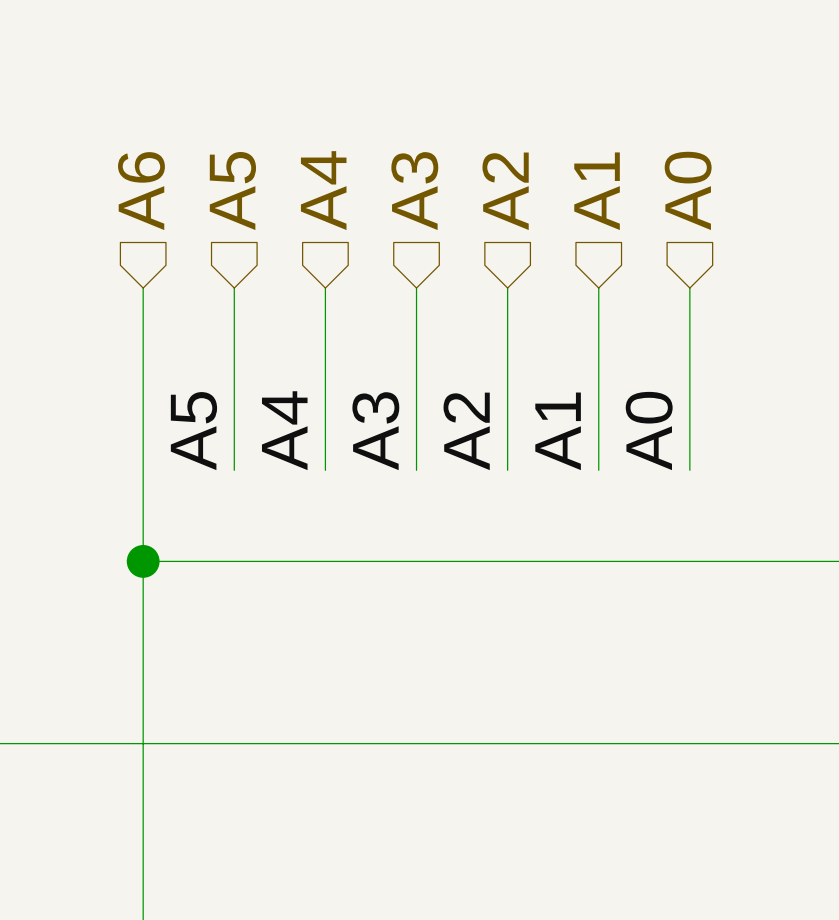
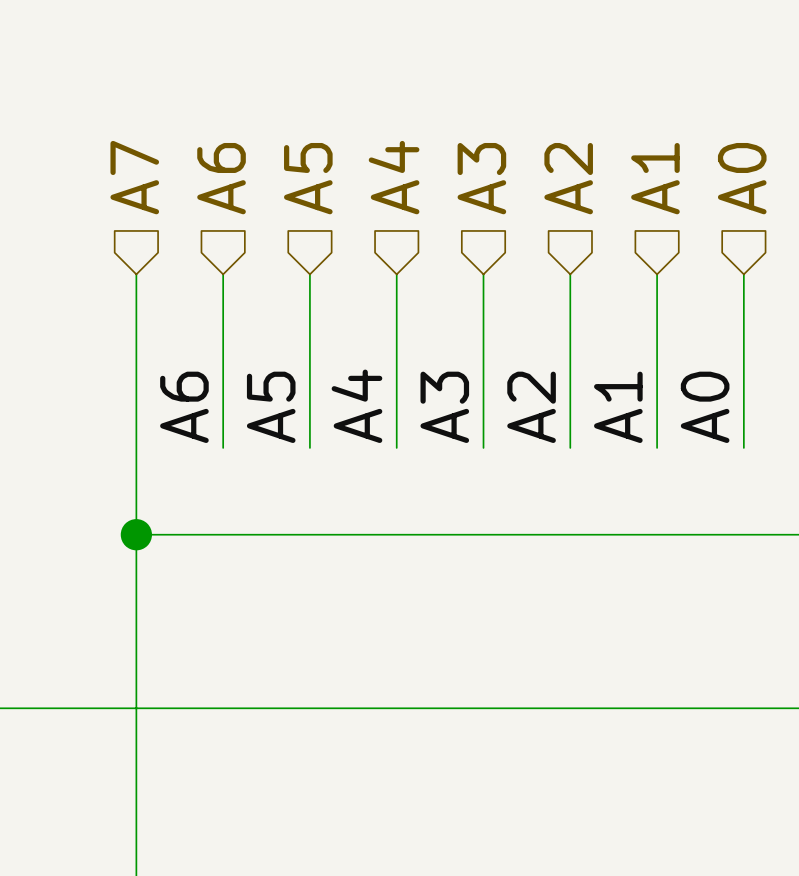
hierarchical label: A4 (323, 190) -> A5 (308, 178)
hierarchical label: A0 (688, 190) -> A1 (655, 178)
hierarchical label: none -> A0 (742, 178)
hierarchical label: A6 (141, 191) -> A7 (134, 177)
hierarchical label: A5 (232, 191) -> A6 (221, 178)
hierarchical label: A3 (414, 191) -> A4 (394, 177)
hierarchical label: A2 (505, 191) -> A3 (481, 178)
hierarchical label: A1 (597, 191) -> A2 (568, 178)
wire: none -> (743, 274) (743, 447)
label: A4 (284, 430) -> A5 (271, 407)
label: A5 (193, 431) -> A6 (184, 407)
label: A3 (375, 431) -> A4 (356, 406)
label: A2 (466, 431) -> A3 (444, 407)
label: A1 (558, 431) -> A2 (531, 407)
label: A0 (649, 431) -> A1 (618, 407)
label: none -> A0 (705, 407)

